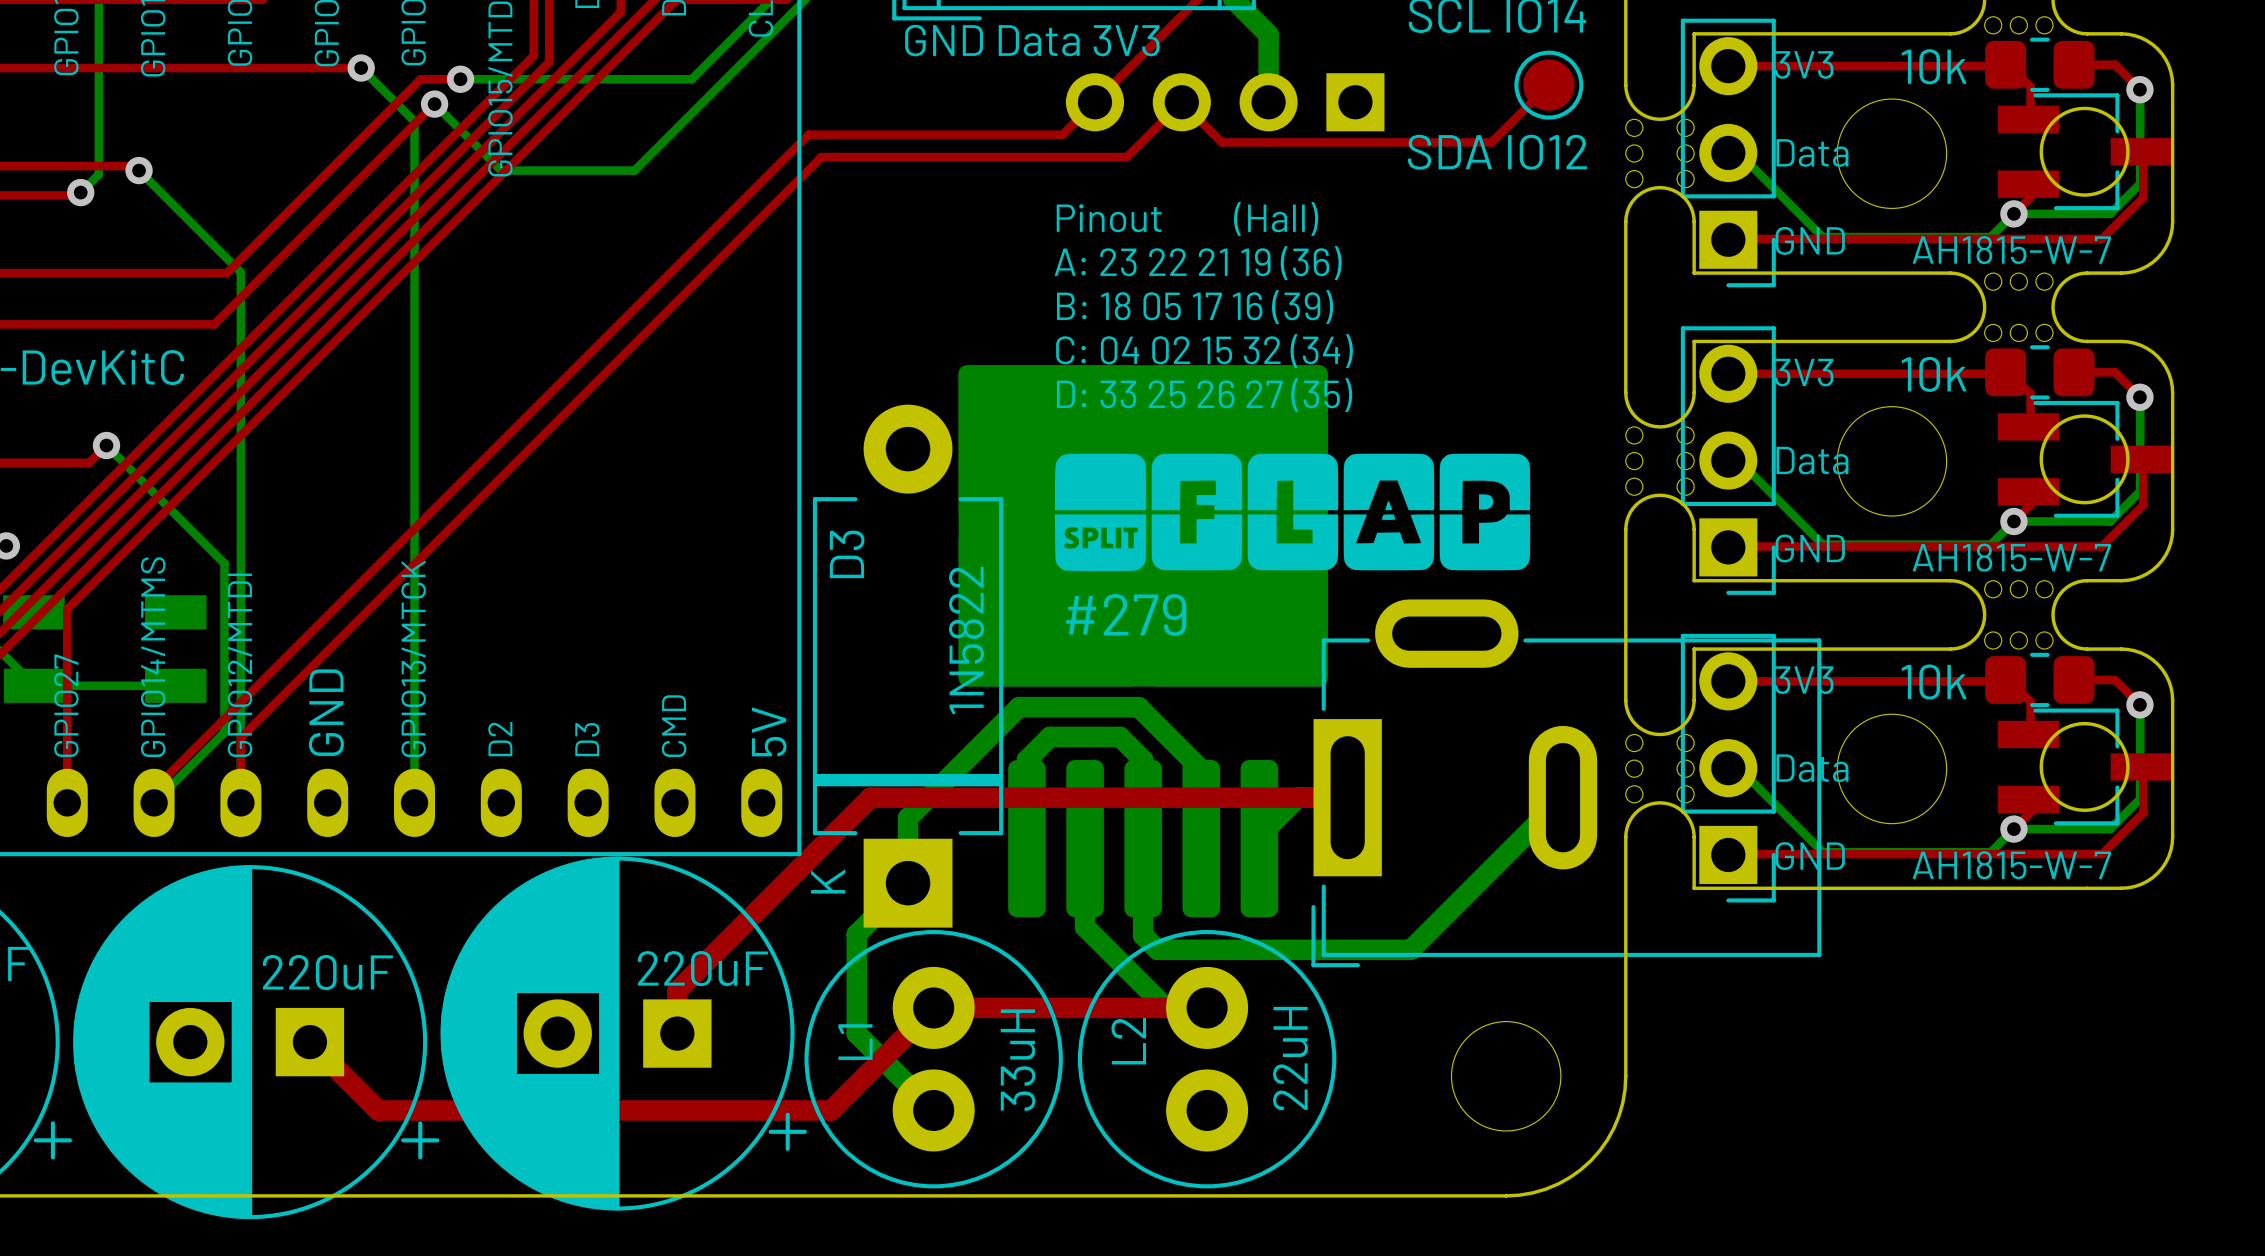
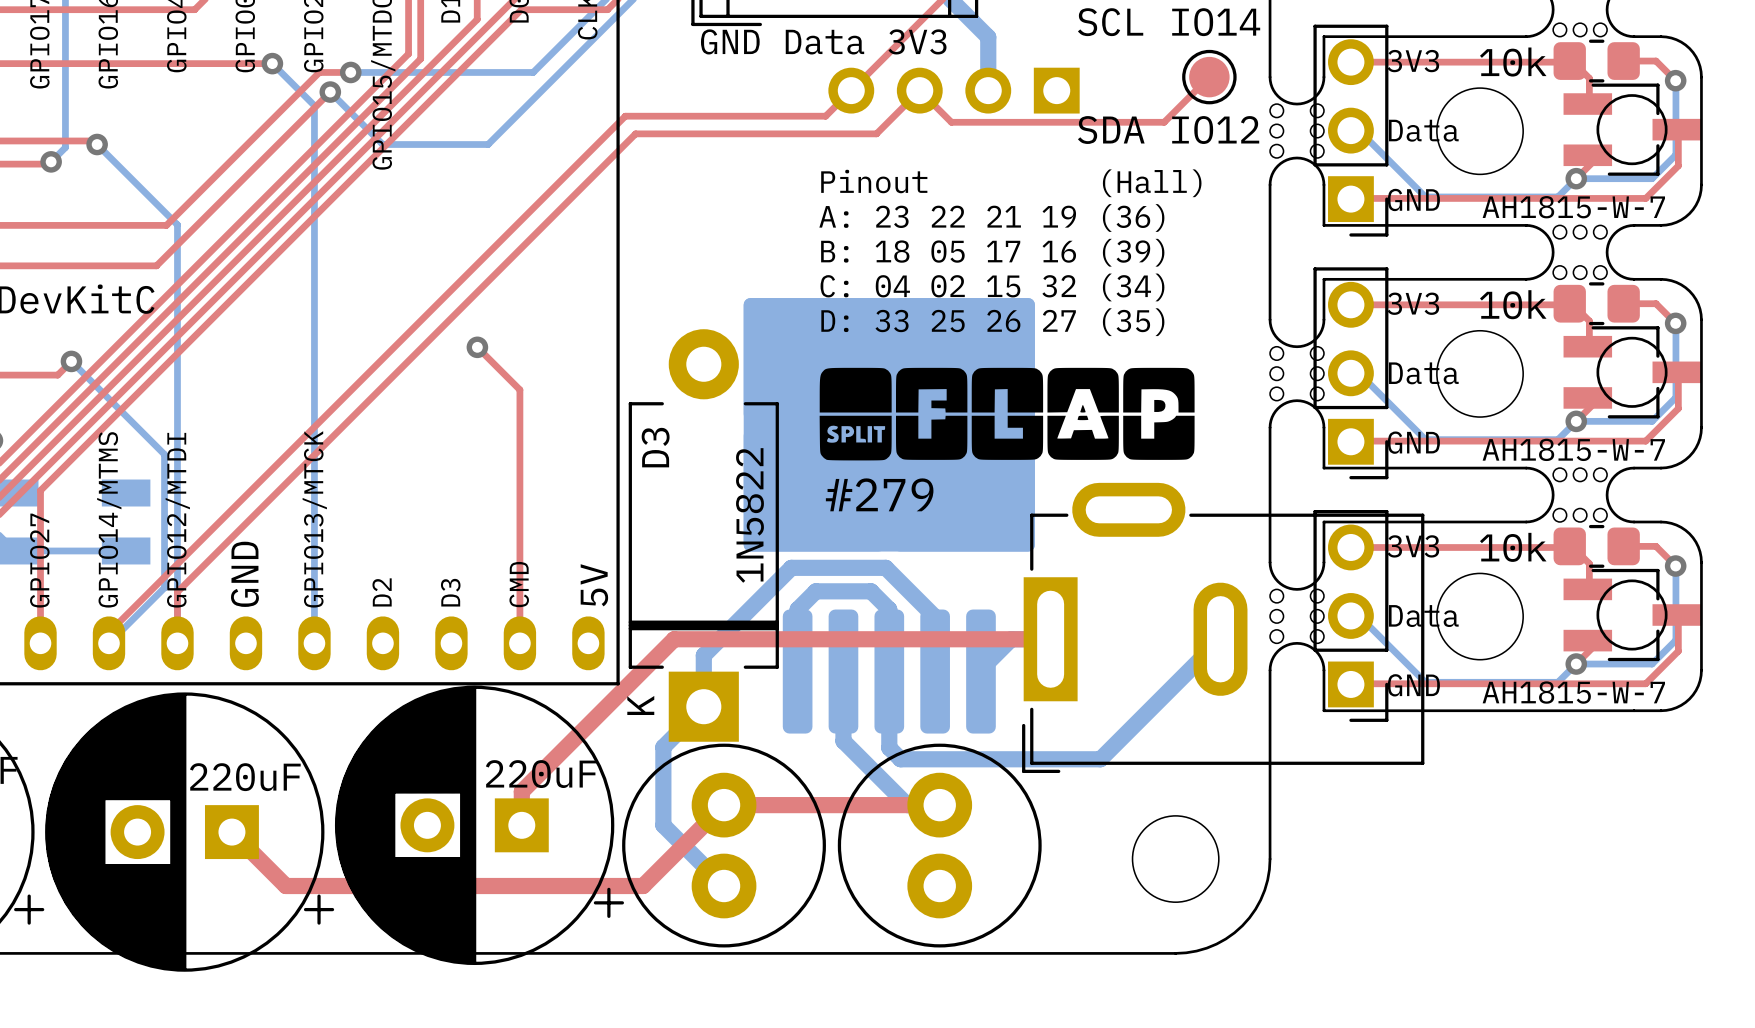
top track: none -> (477, 347) (519, 389) (519, 643)
via: none -> (477, 347)
L2 name: L2 (1128, 1041) -> none
L1 name: L1 (855, 1042) -> none
L2 value: 22uH (1290, 1058) -> none
L1 value: 33uH (1018, 1060) -> none

